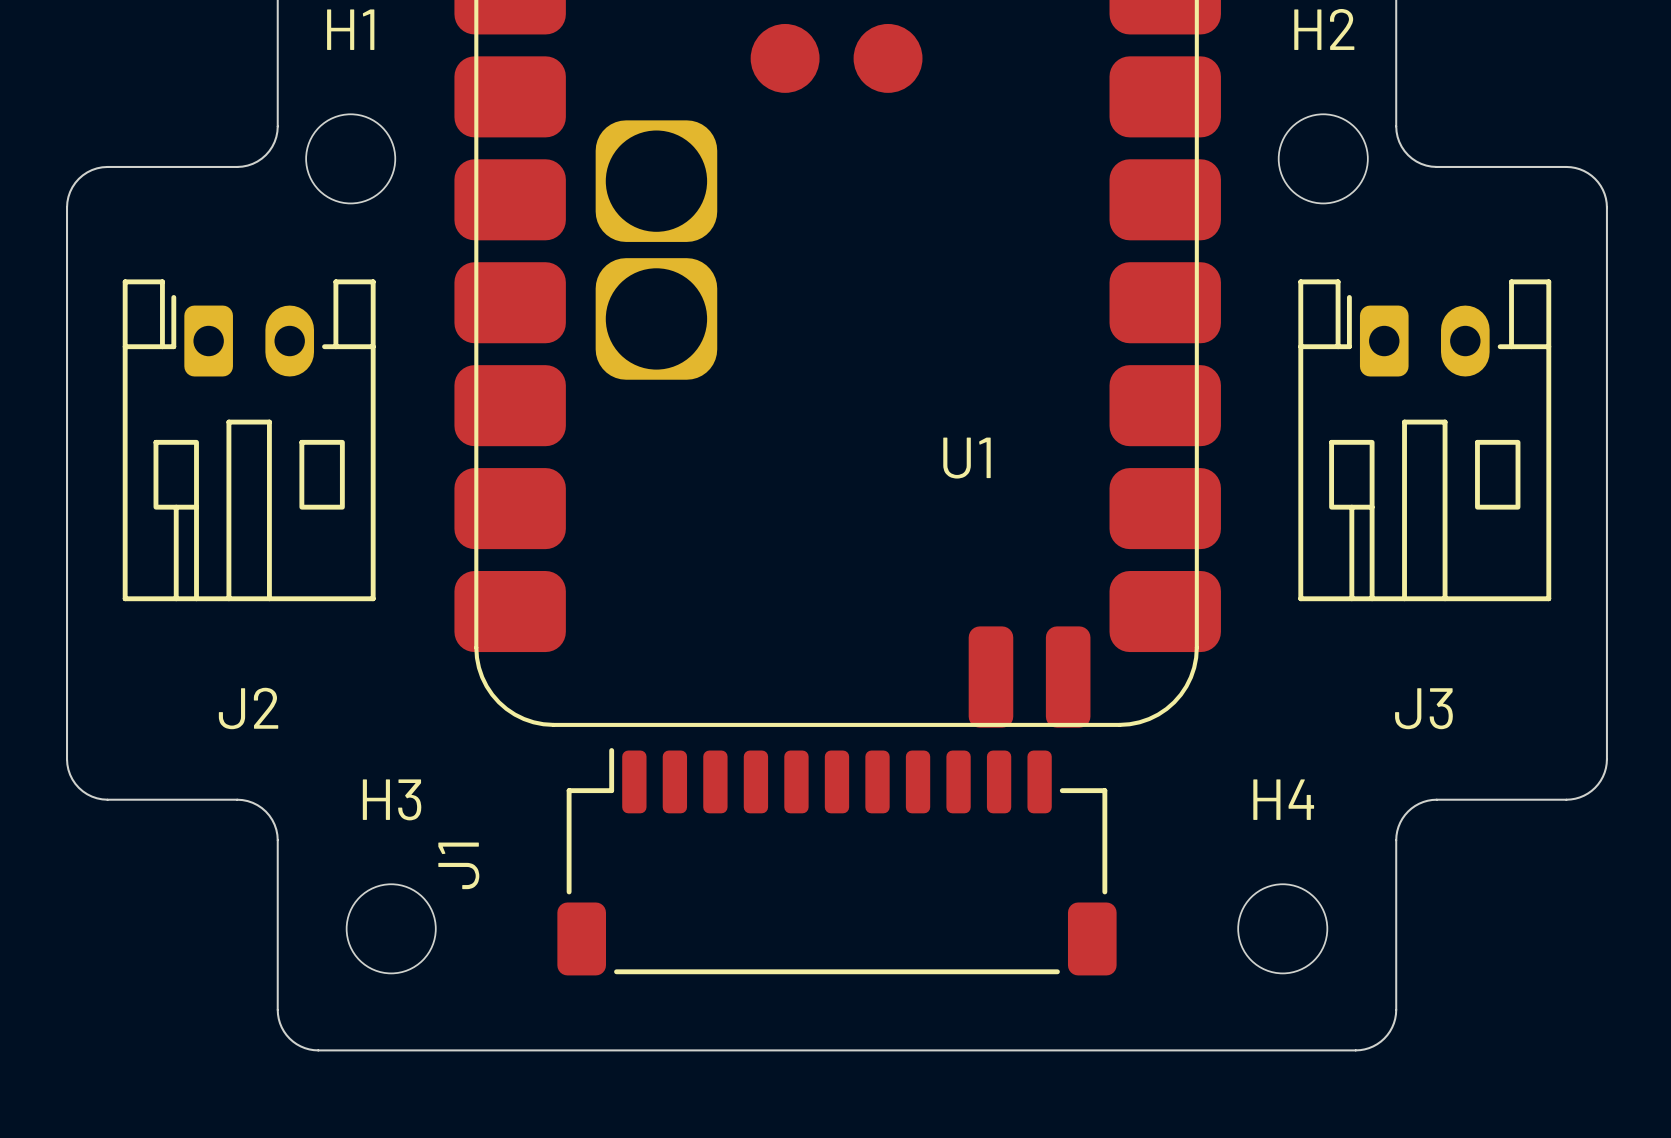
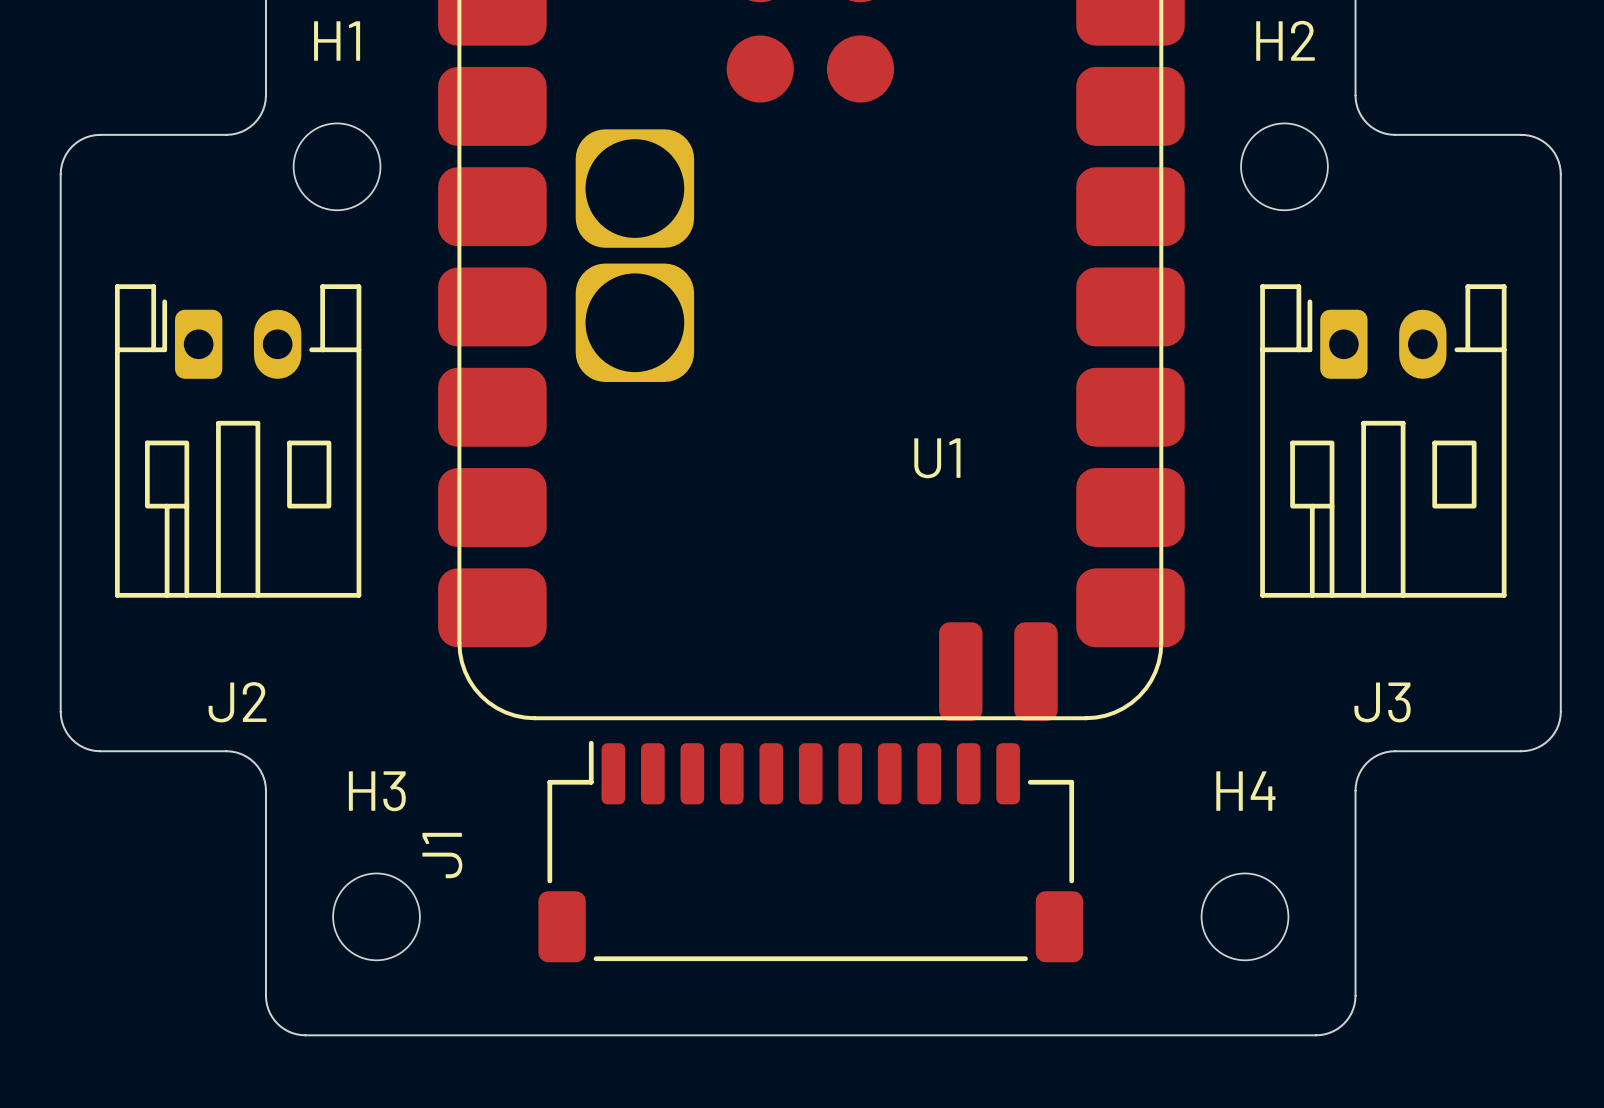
board edge: (277, 85) (276, 136) (269, 151) (257, 161) (237, 166) (97, 168) (82, 175) (75, 182) (70, 191) (67, 207) -> (265, 95) (262, 110) (257, 119) (246, 129) (236, 133) (100, 134) (80, 140) (68, 150) (62, 164) (60, 214)
board edge: (1396, 85) (1397, 136) (1404, 151) (1416, 161) (1436, 166) (1575, 167) (1587, 173) (1598, 182) (1604, 194) (1606, 207) -> (1355, 95) (1357, 108) (1364, 119) (1374, 128) (1386, 133) (1521, 134) (1542, 140) (1554, 153) (1559, 165) (1560, 214)
board edge: (67, 718) (68, 769) (75, 783) (87, 794) (107, 799) (247, 801) (257, 805) (269, 815) (276, 829) (277, 840) -> (60, 711) (63, 726) (68, 735) (80, 745) (89, 749) (226, 751) (246, 756) (257, 766) (264, 780) (265, 830)
board edge: (1606, 718) (1605, 768) (1600, 780) (1587, 793) (1579, 797) (1566, 799) (1427, 800) (1415, 805) (1405, 814) (1398, 826) (1396, 840) -> (1560, 711) (1558, 724) (1552, 736) (1542, 745) (1530, 750) (1395, 751) (1374, 757) (1364, 766) (1356, 781) (1355, 830)

